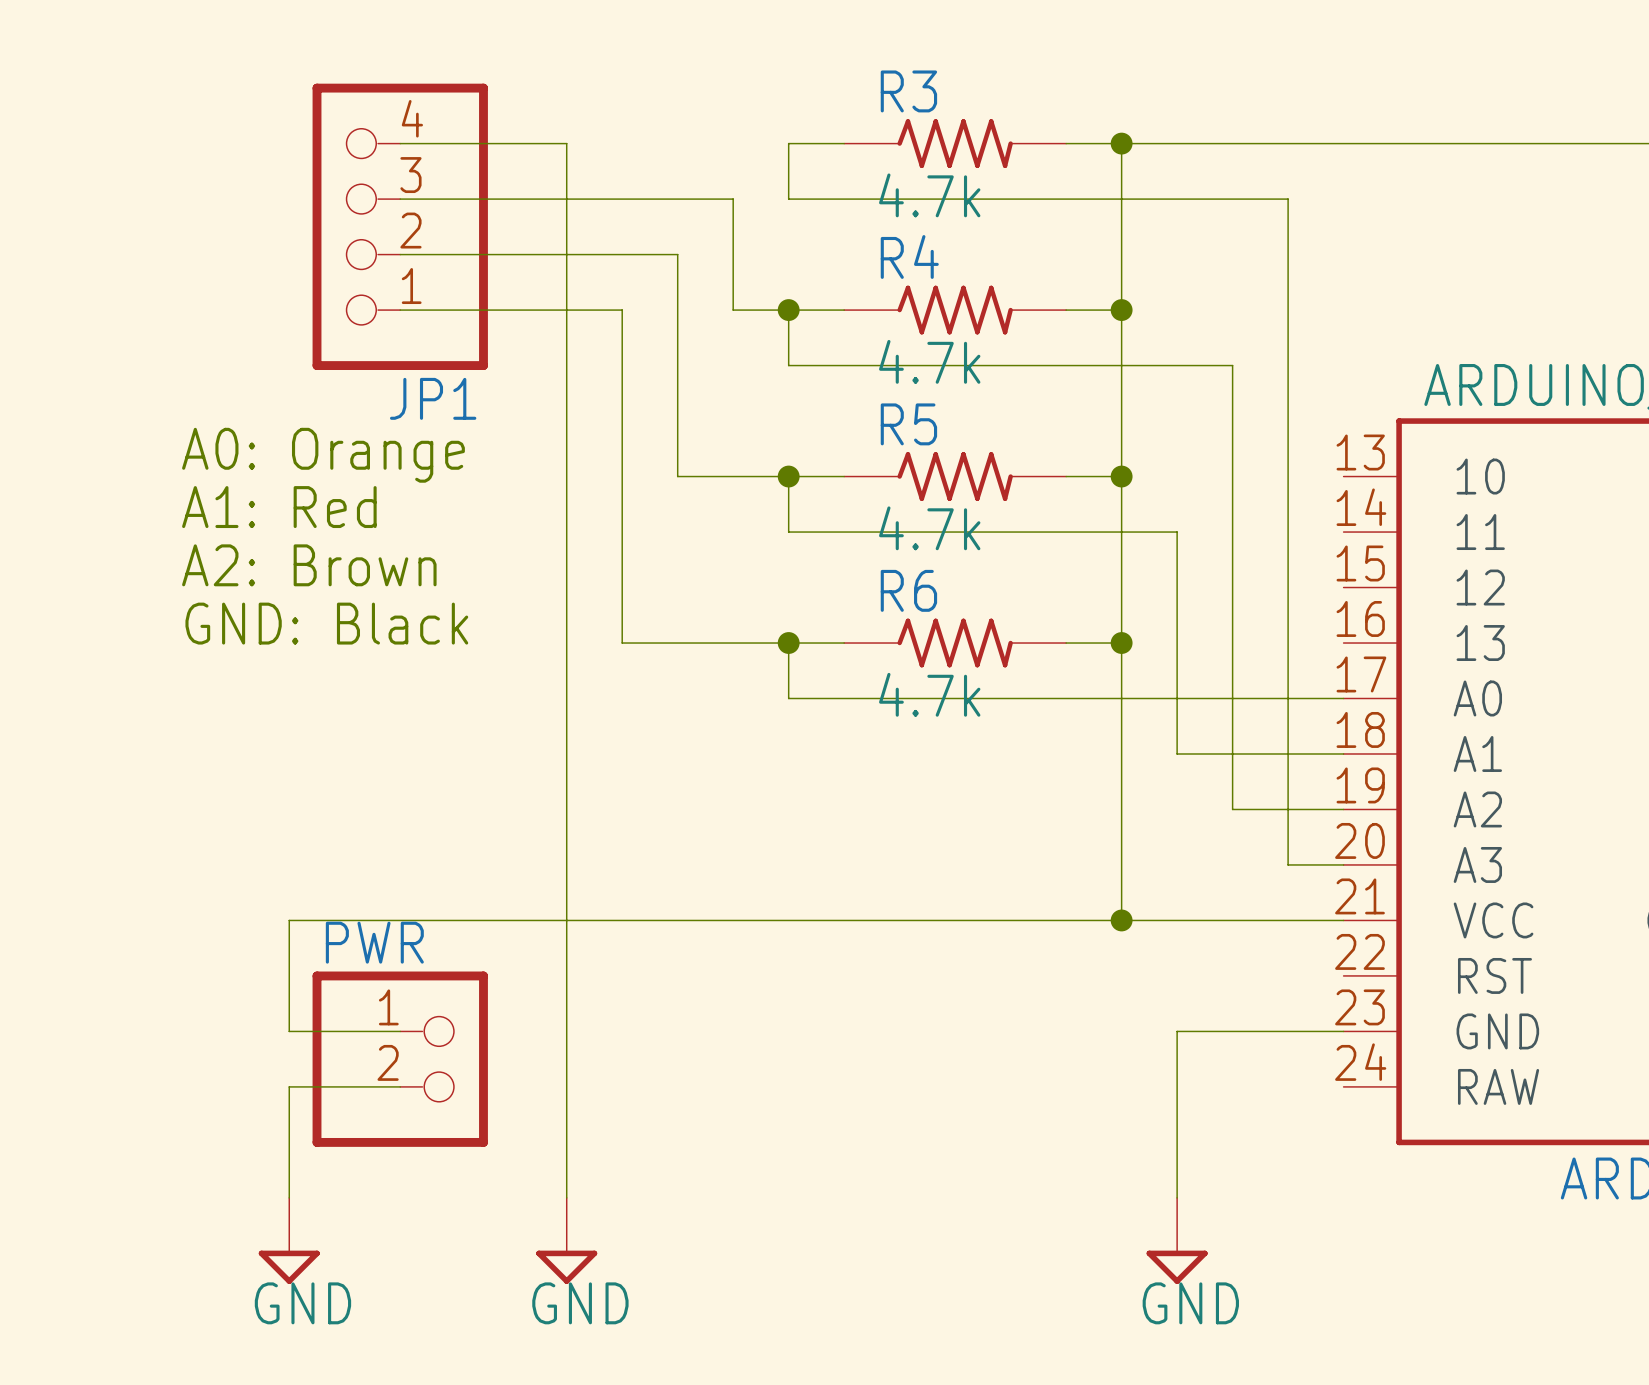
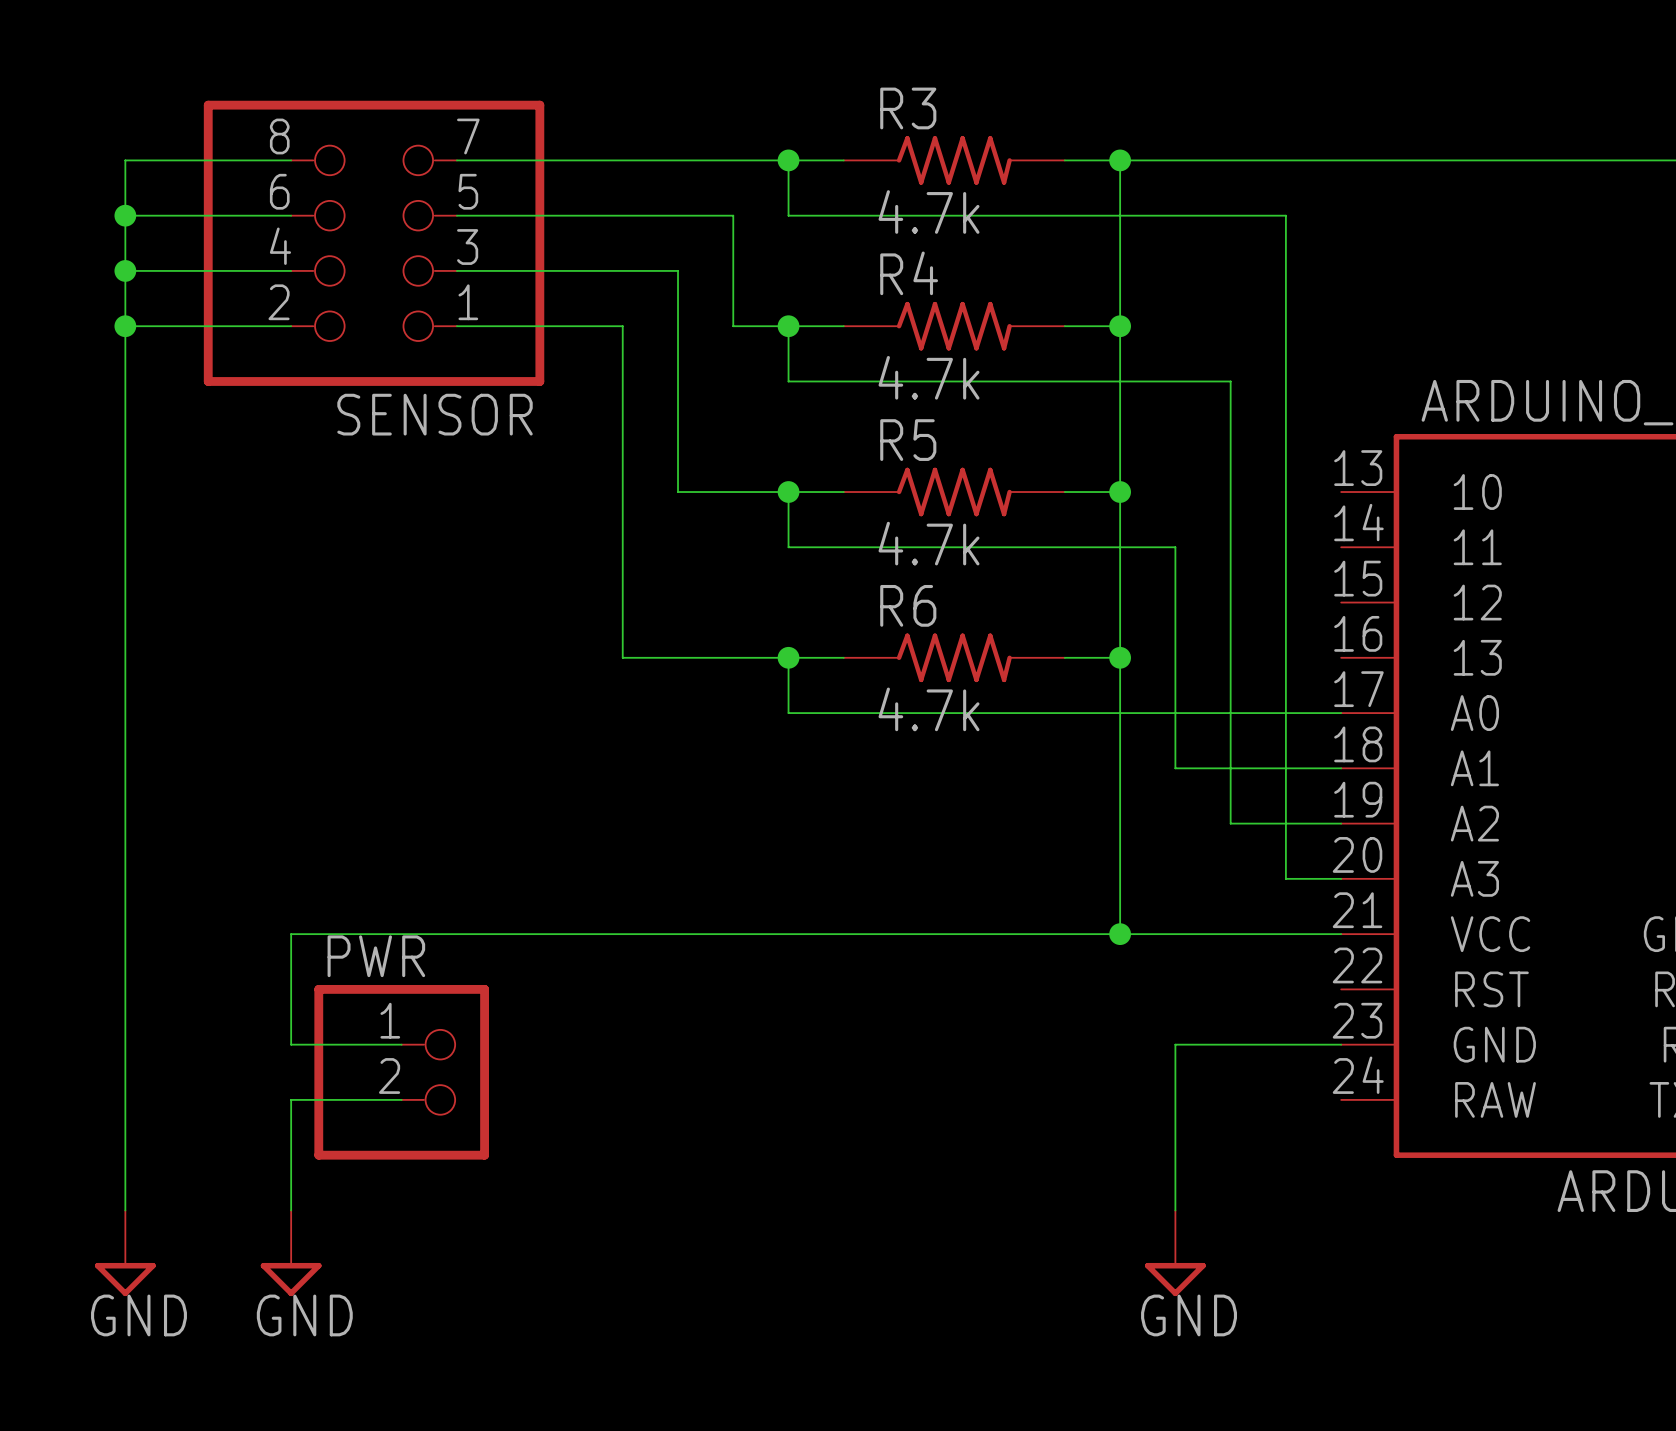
wire: none -> (291, 160) (125, 160) (125, 1210)
wire: (400, 143) (455, 143) -> none
wire: (566, 143) (566, 1197) -> (567, 160) (788, 160)
junction: none -> (788, 160)
wire: none -> (125, 215) (291, 215)
junction: none -> (125, 215)
wire: (400, 199) (455, 199) -> none
SENSOR: none -> (374, 243)
JP1: (400, 226) -> none
wire: none -> (125, 270) (291, 270)
junction: none -> (125, 270)
wire: (400, 254) (455, 254) -> none
wire: none -> (125, 326) (291, 326)
junction: none -> (125, 326)
wire: (400, 310) (455, 310) -> none
text: A0: Orange (323, 455) -> none
text: A1: Red (279, 507) -> none
text: A2: Brown (309, 565) -> none
text: GND: Black (326, 623) -> none
power symbol position: GND (566, 1240) -> GND (125, 1253)

